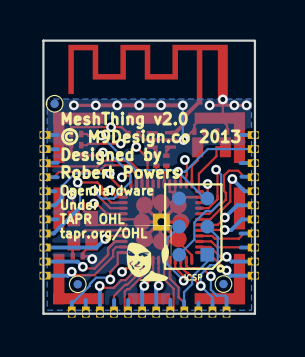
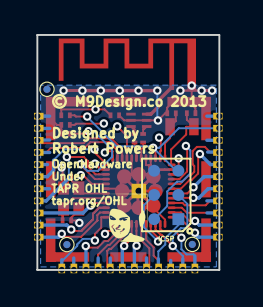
text: MeshThing v2.0 (124, 120) -> none
text position: © M9Design.co 2013 (150, 137) -> © M9Design.co 2013 (129, 102)

